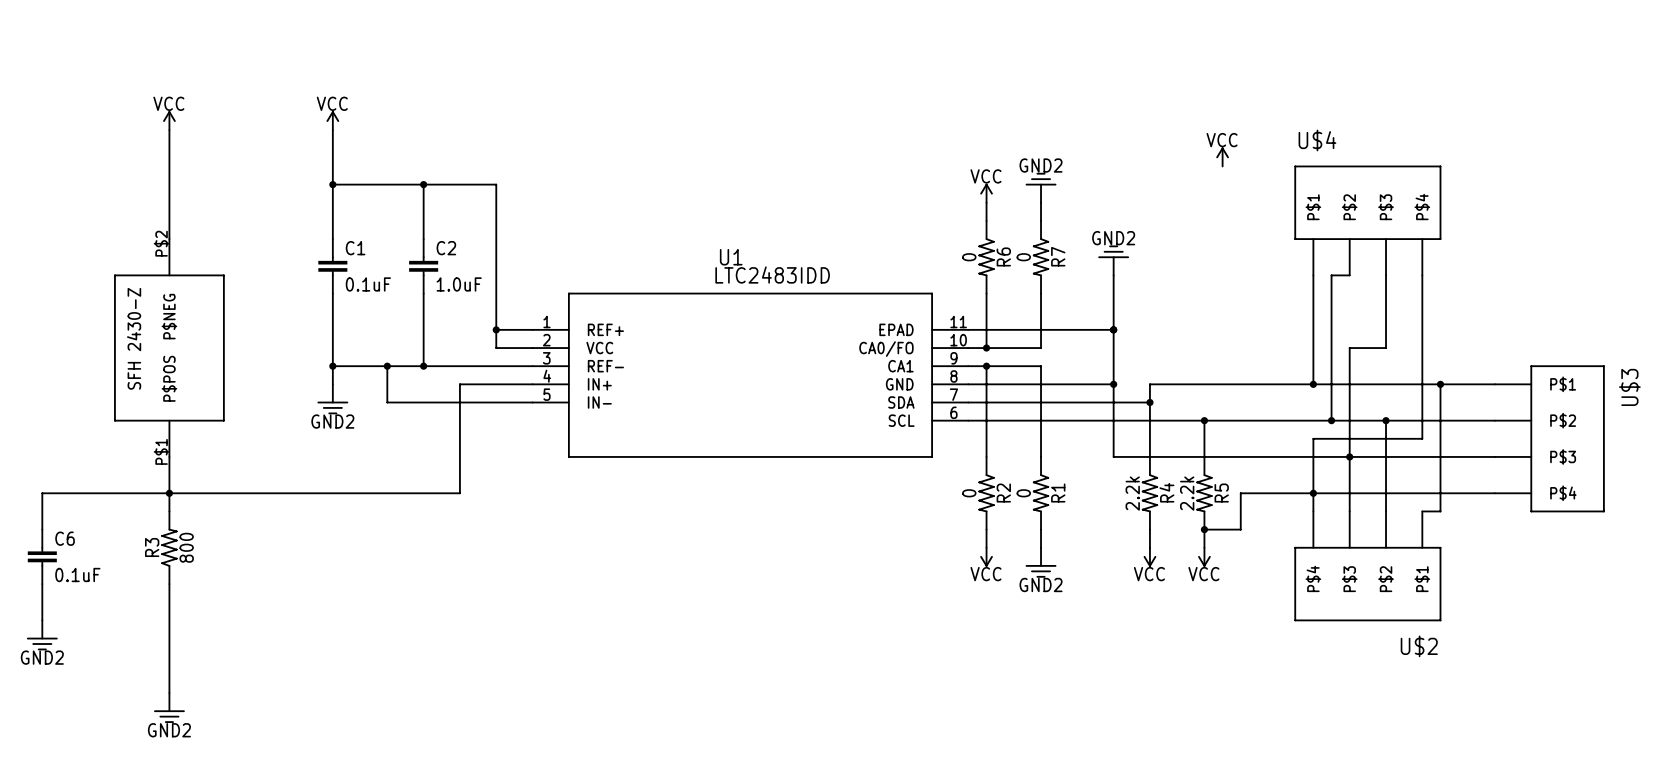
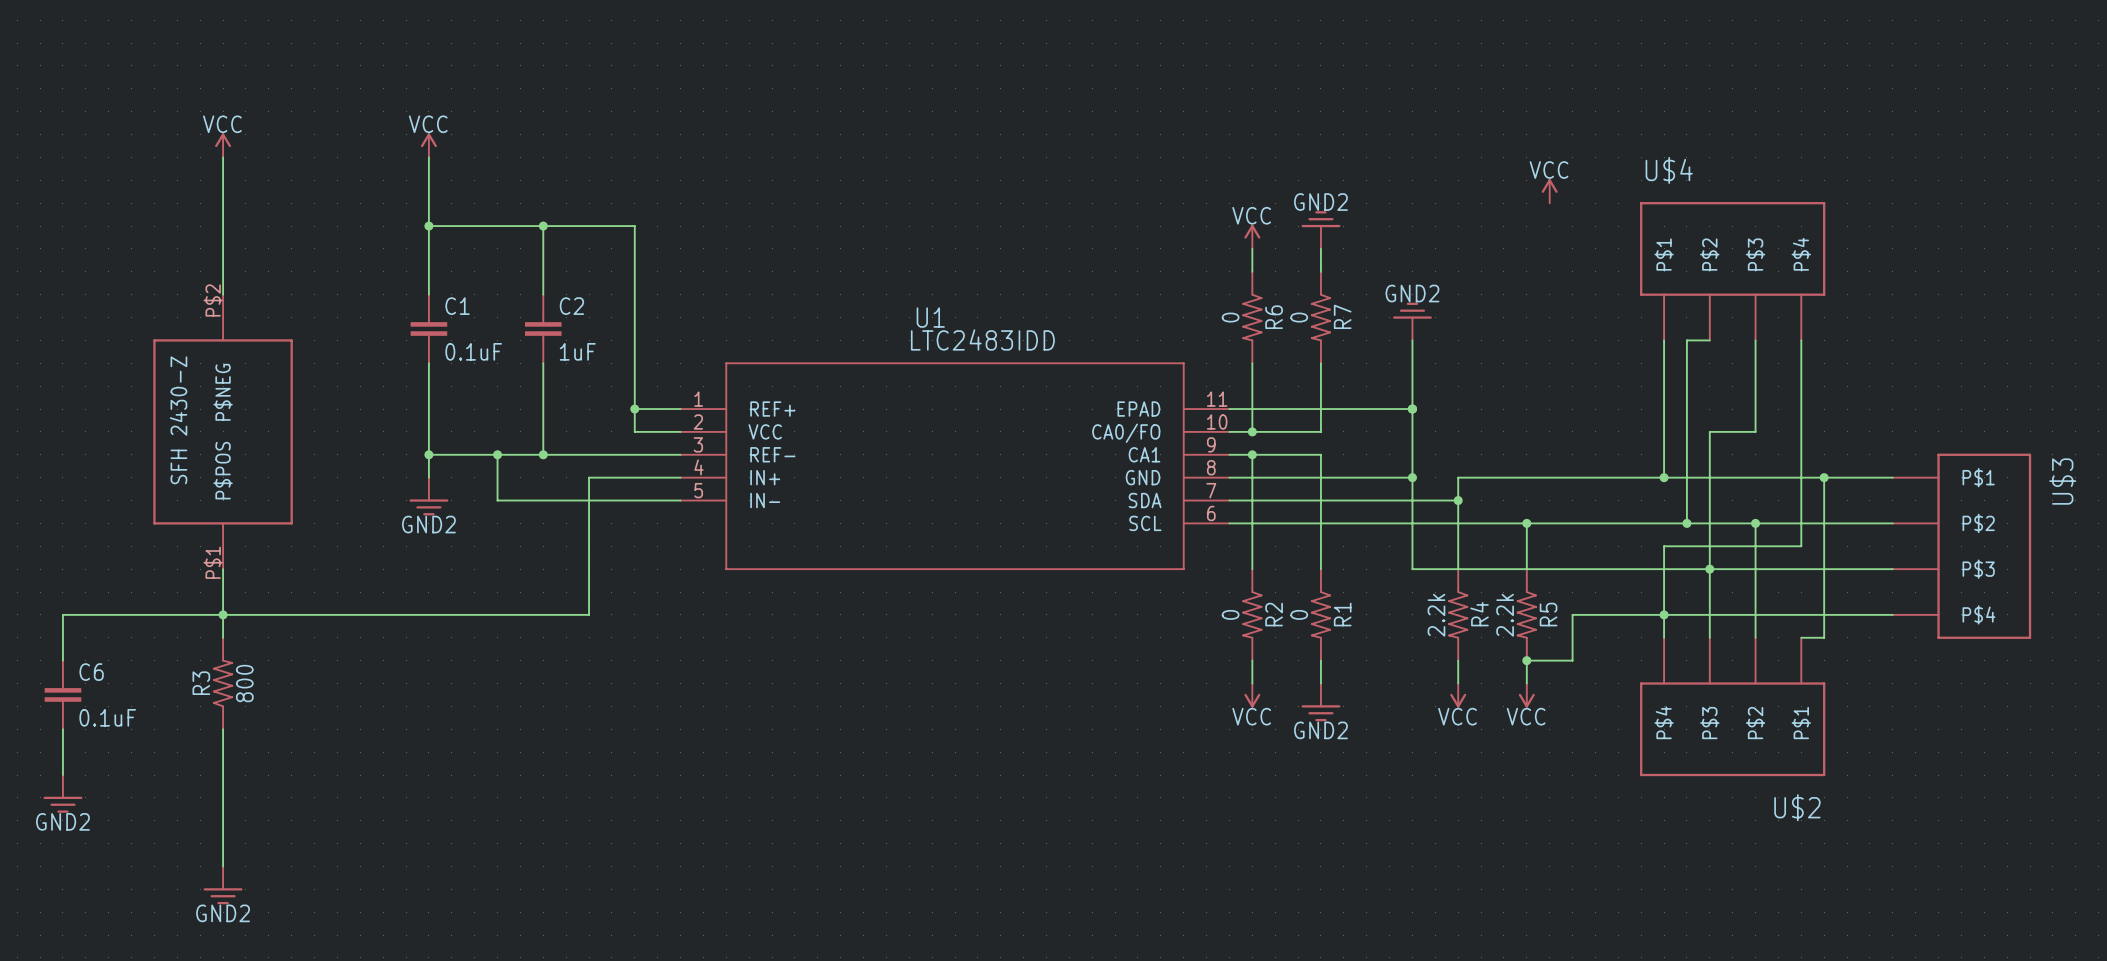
C2 value: 1.0uF (459, 284) -> 1uF (577, 351)

